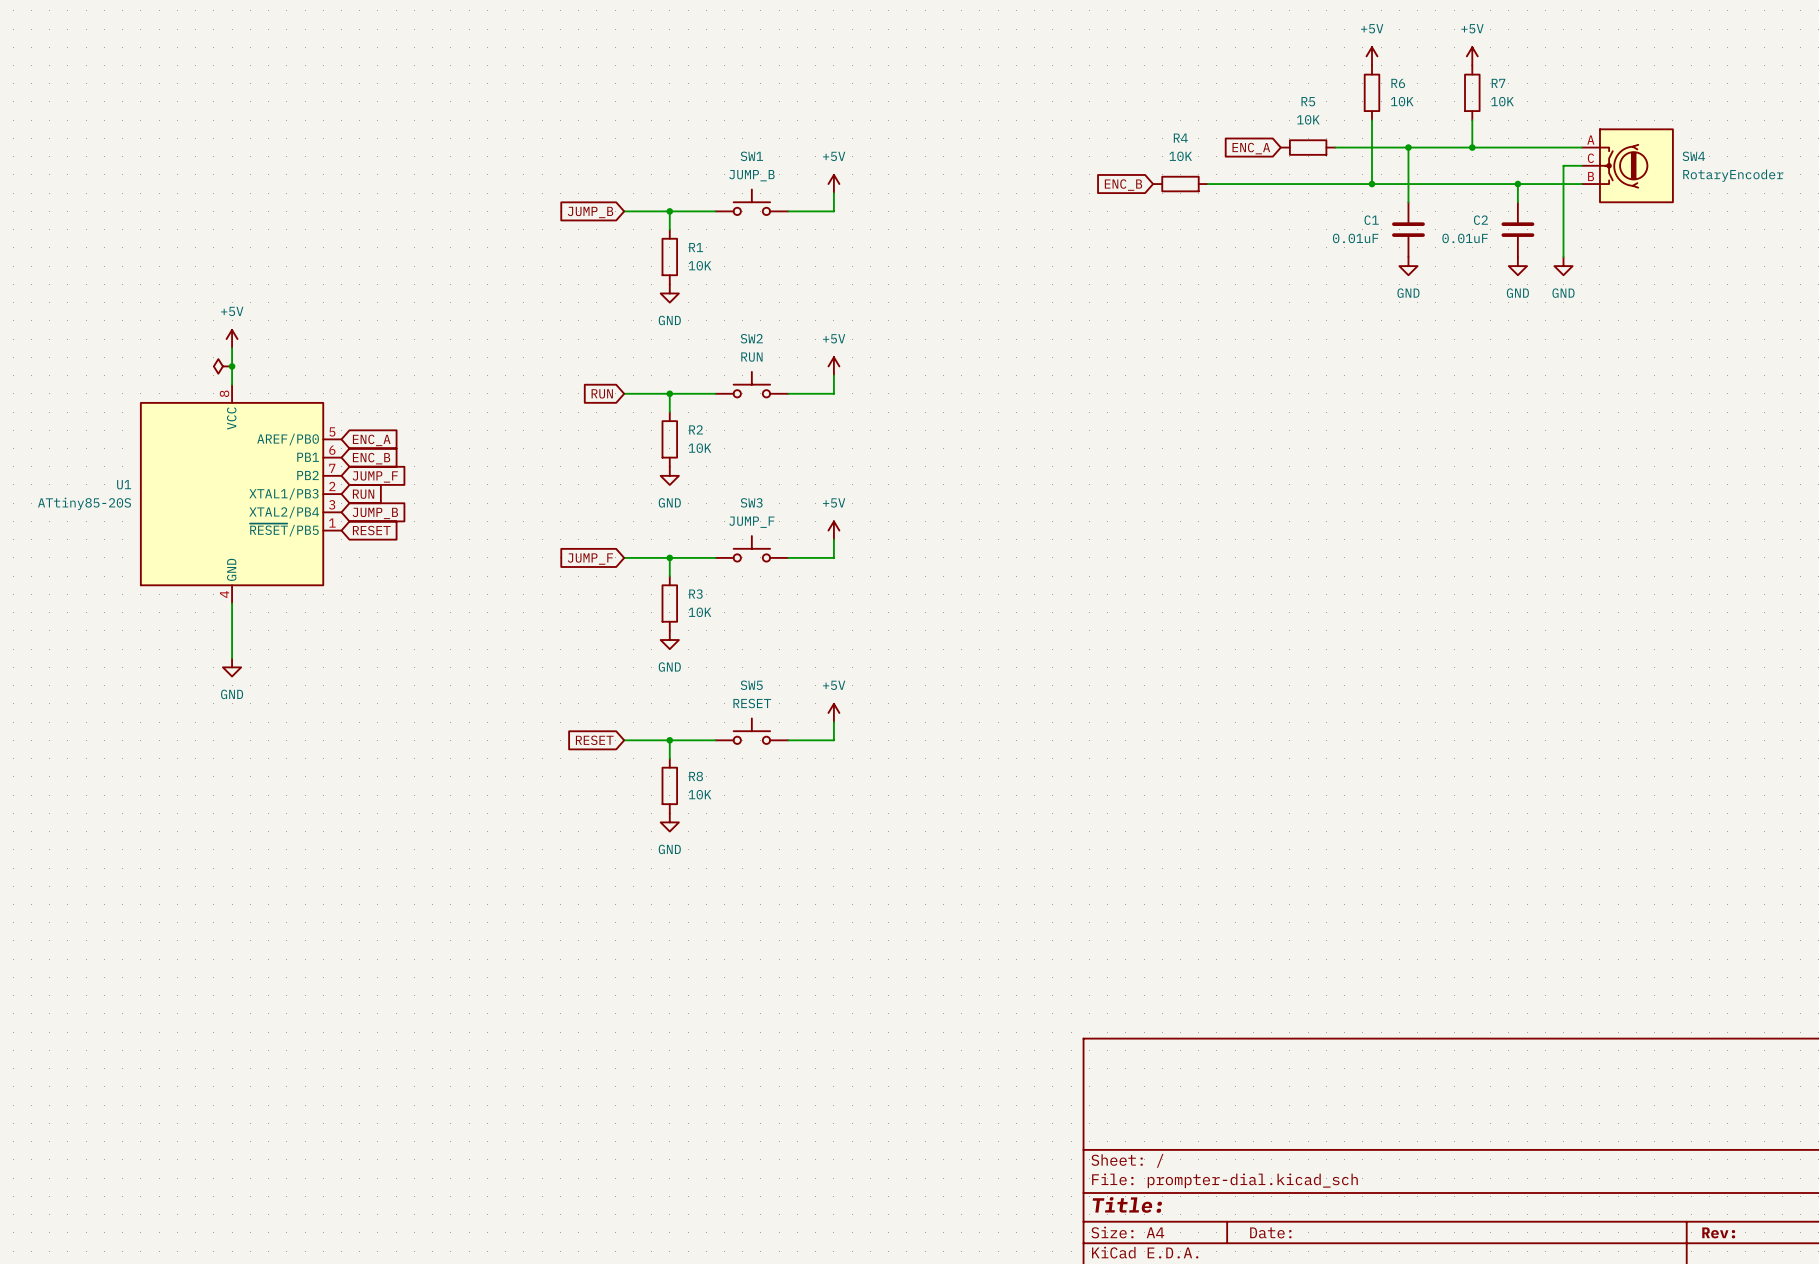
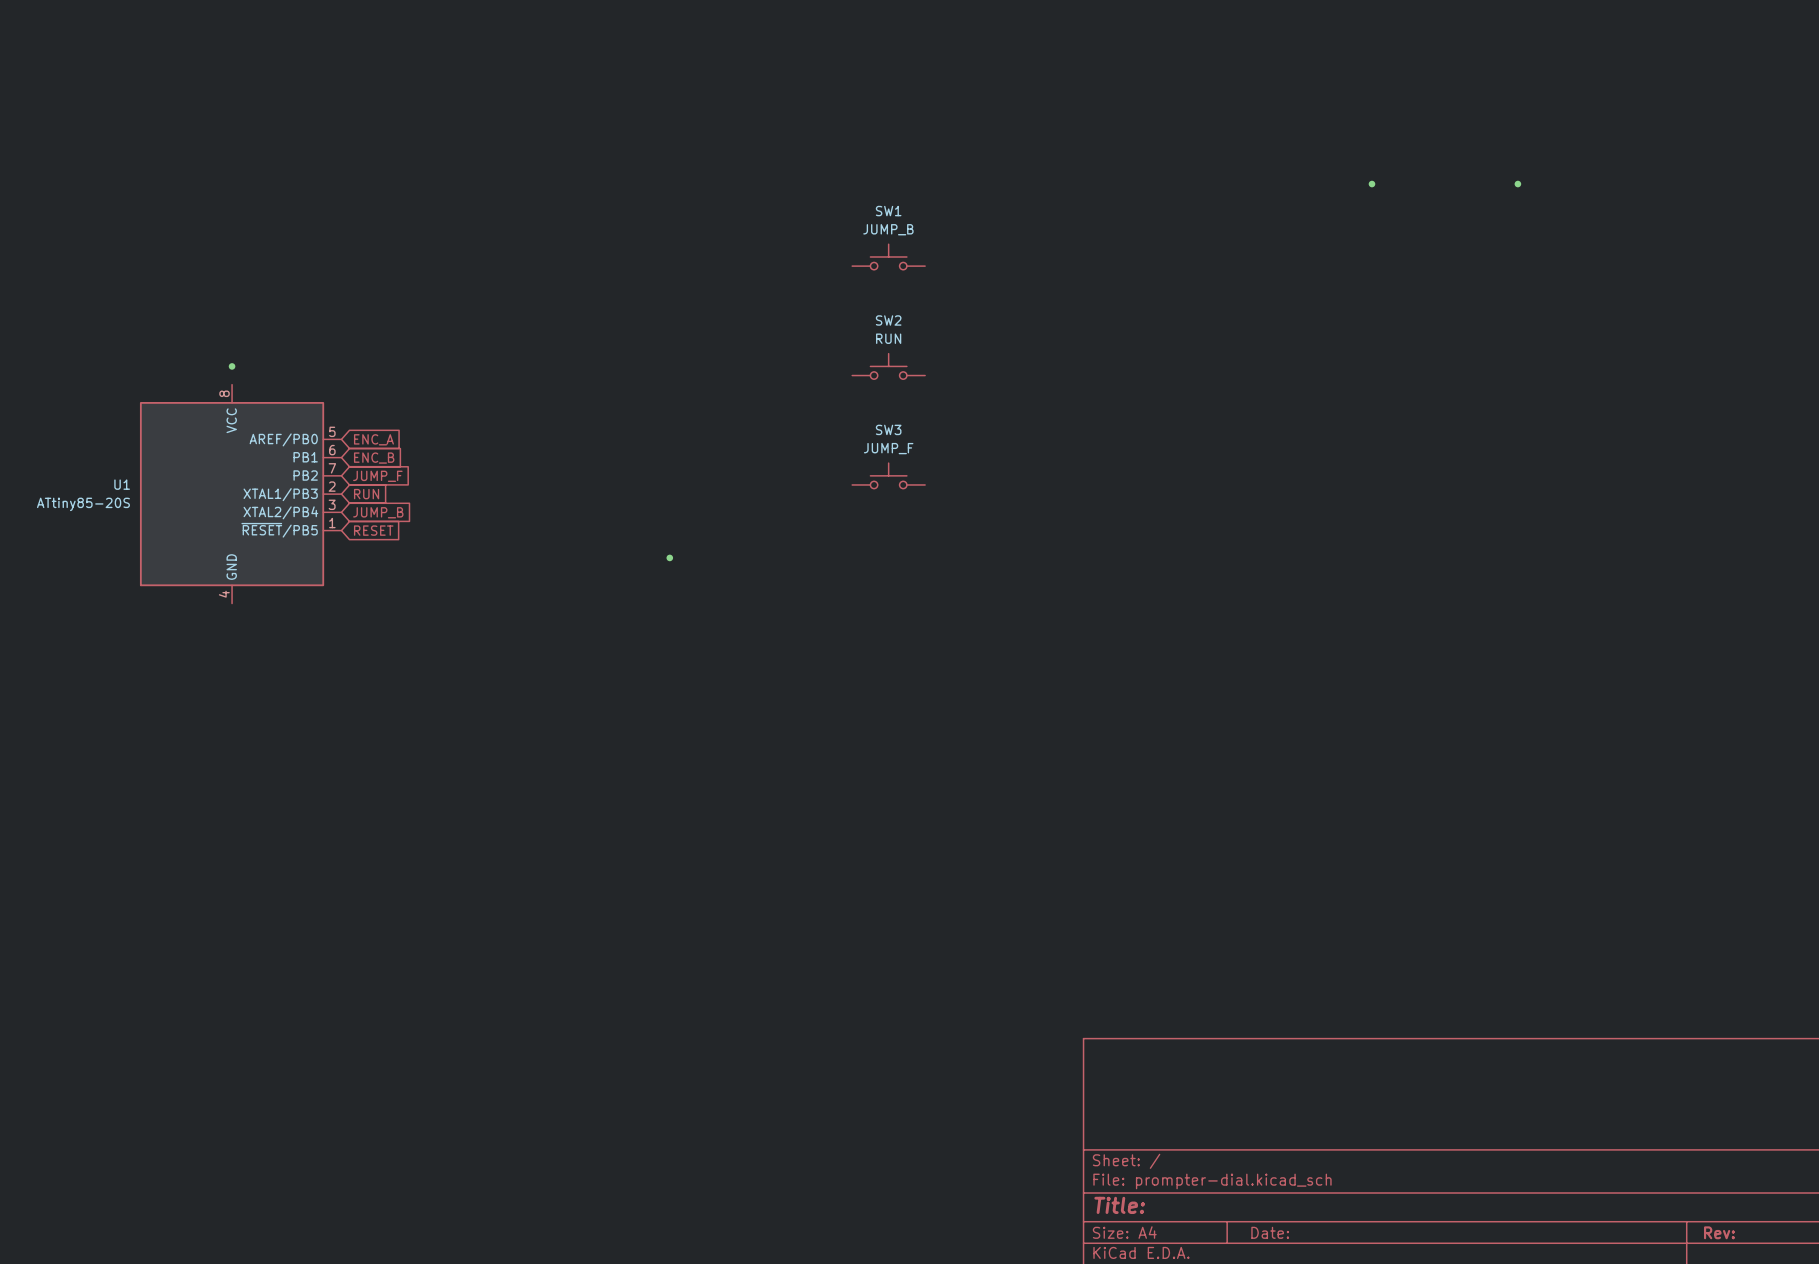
power symbol: +5V (1371, 56) -> none
power symbol: +5V (1472, 56) -> none
R6: 10K (1371, 92) -> none
R7: 10K (1472, 92) -> none
wire: (1371, 120) (1371, 184) -> none
wire: (1472, 120) (1472, 147) -> none
R5: 10K (1308, 147) -> none
wire: (1335, 147) (1581, 147) -> none
wire: (1408, 147) (1408, 202) -> none
junction: (1408, 147) -> none
junction: (1472, 147) -> none
global label: ENC_A (1251, 148) -> none
wire: (1581, 165) (1563, 165) (1563, 256) -> none
SW4: RotaryEncoder (1627, 165) -> none
power symbol: +5V (833, 184) -> none
R4: 10K (1180, 184) -> none
wire: (1207, 184) (1581, 184) -> none
wire: (1517, 184) (1517, 202) -> none
global label: ENC_B (1123, 185) -> none
wire: (833, 193) (833, 211) (788, 211) -> none
SW1 position: (751, 202) -> (888, 256)
wire: (624, 211) (715, 211) -> none
wire: (669, 211) (669, 229) -> none
junction: (669, 211) -> none
global label: JUMP_B (590, 212) -> none
C1: 0.01uF (1408, 229) -> none
C2: 0.01uF (1517, 229) -> none
R1: 10K (669, 256) -> none
power symbol: GND (1408, 266) -> none
power symbol: GND (1517, 266) -> none
power symbol: GND (1563, 266) -> none
power symbol: GND (669, 293) -> none
power symbol: +5V (232, 339) -> none
wire: (232, 348) (232, 384) -> none
power symbol: (222, 366) -> none
power symbol: +5V (833, 366) -> none
wire: (833, 375) (833, 393) (788, 393) -> none
SW2 position: (751, 384) -> (888, 366)
global label: RUN (602, 393) -> none
wire: (624, 393) (715, 393) -> none
wire: (669, 393) (669, 412) -> none
junction: (669, 393) -> none
R2: 10K (669, 439) -> none
power symbol: GND (669, 475) -> none
power symbol: +5V (833, 530) -> none
wire: (833, 539) (833, 557) (788, 557) -> none
SW3 position: (751, 548) -> (888, 475)
wire: (624, 557) (715, 557) -> none
wire: (669, 557) (669, 576) -> none
global label: JUMP_F (590, 559) -> none
wire: (232, 603) (232, 658) -> none
R3: 10K (669, 603) -> none
power symbol: GND (669, 640) -> none
power symbol: GND (232, 667) -> none
power symbol: +5V (833, 712) -> none
wire: (833, 722) (833, 740) (788, 740) -> none
SW5: RESET (751, 731) -> none
global label: RESET (594, 740) -> none
wire: (624, 740) (715, 740) -> none
wire: (669, 740) (669, 758) -> none
junction: (669, 740) -> none
R8: 10K (669, 785) -> none
power symbol: GND (669, 822) -> none

